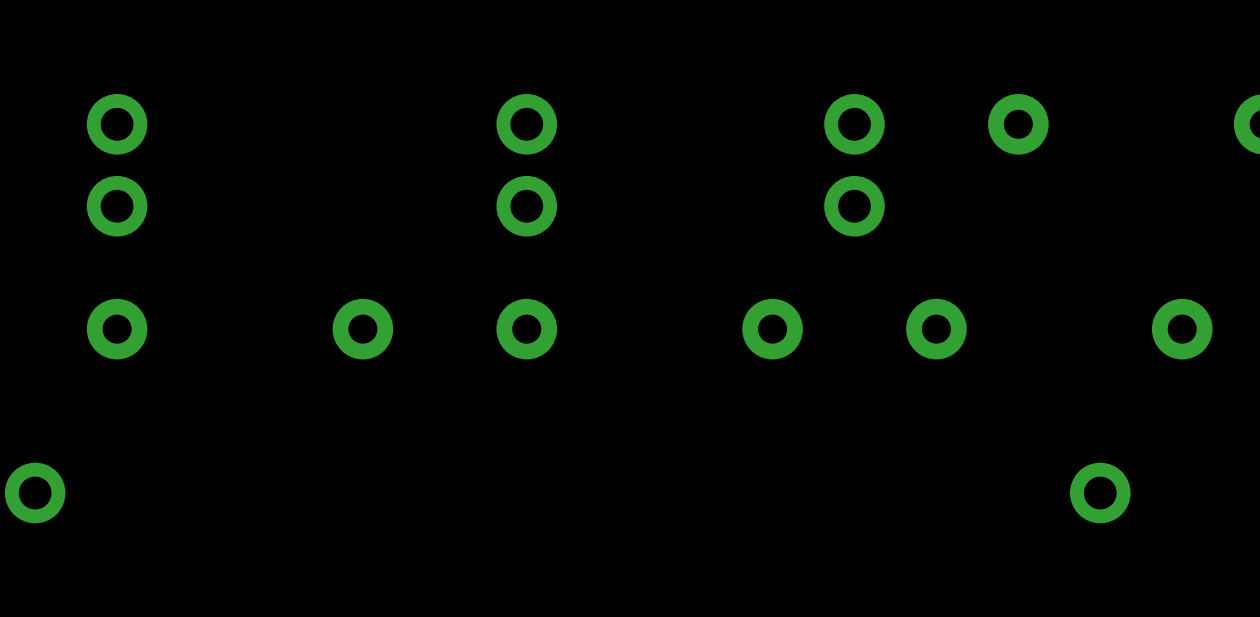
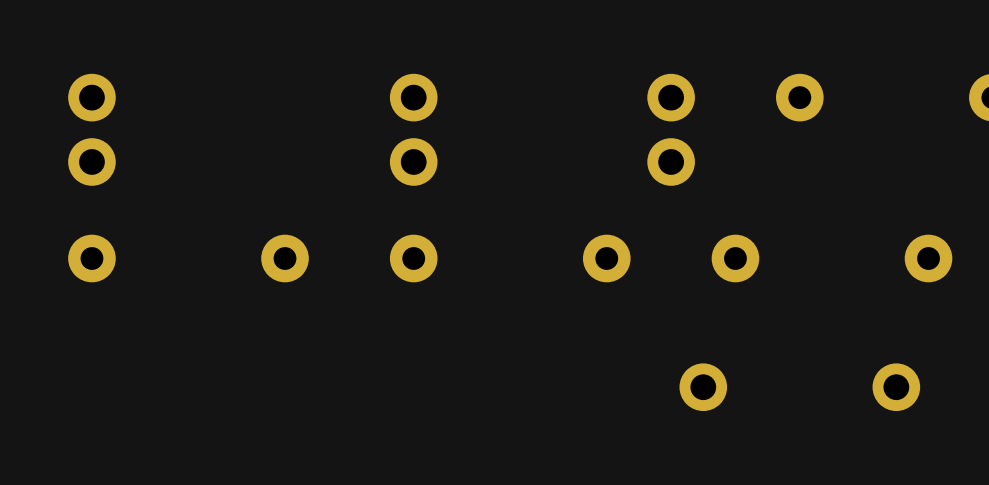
part: (35, 493) -> none
part: none -> (703, 387)
part position: (1100, 493) -> (896, 387)

